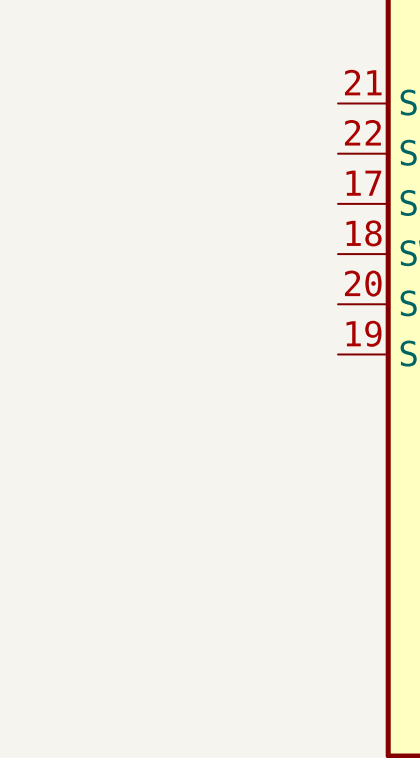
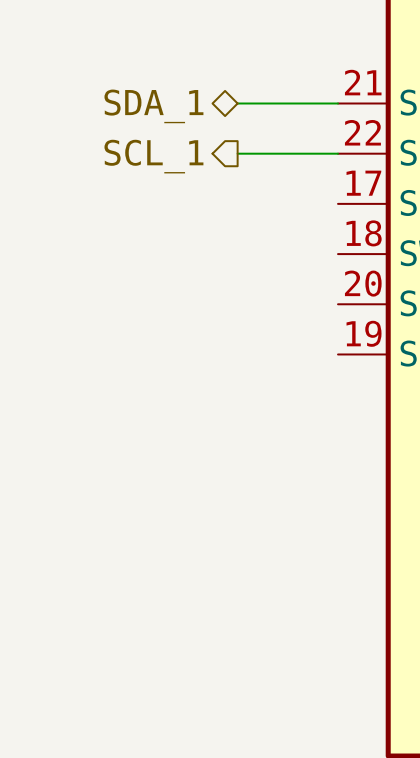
wire: none -> (237, 103) (338, 103)
hierarchical label: none -> SDA_1 (153, 106)
wire: none -> (237, 153) (338, 153)
hierarchical label: none -> SCL_1 (153, 156)

